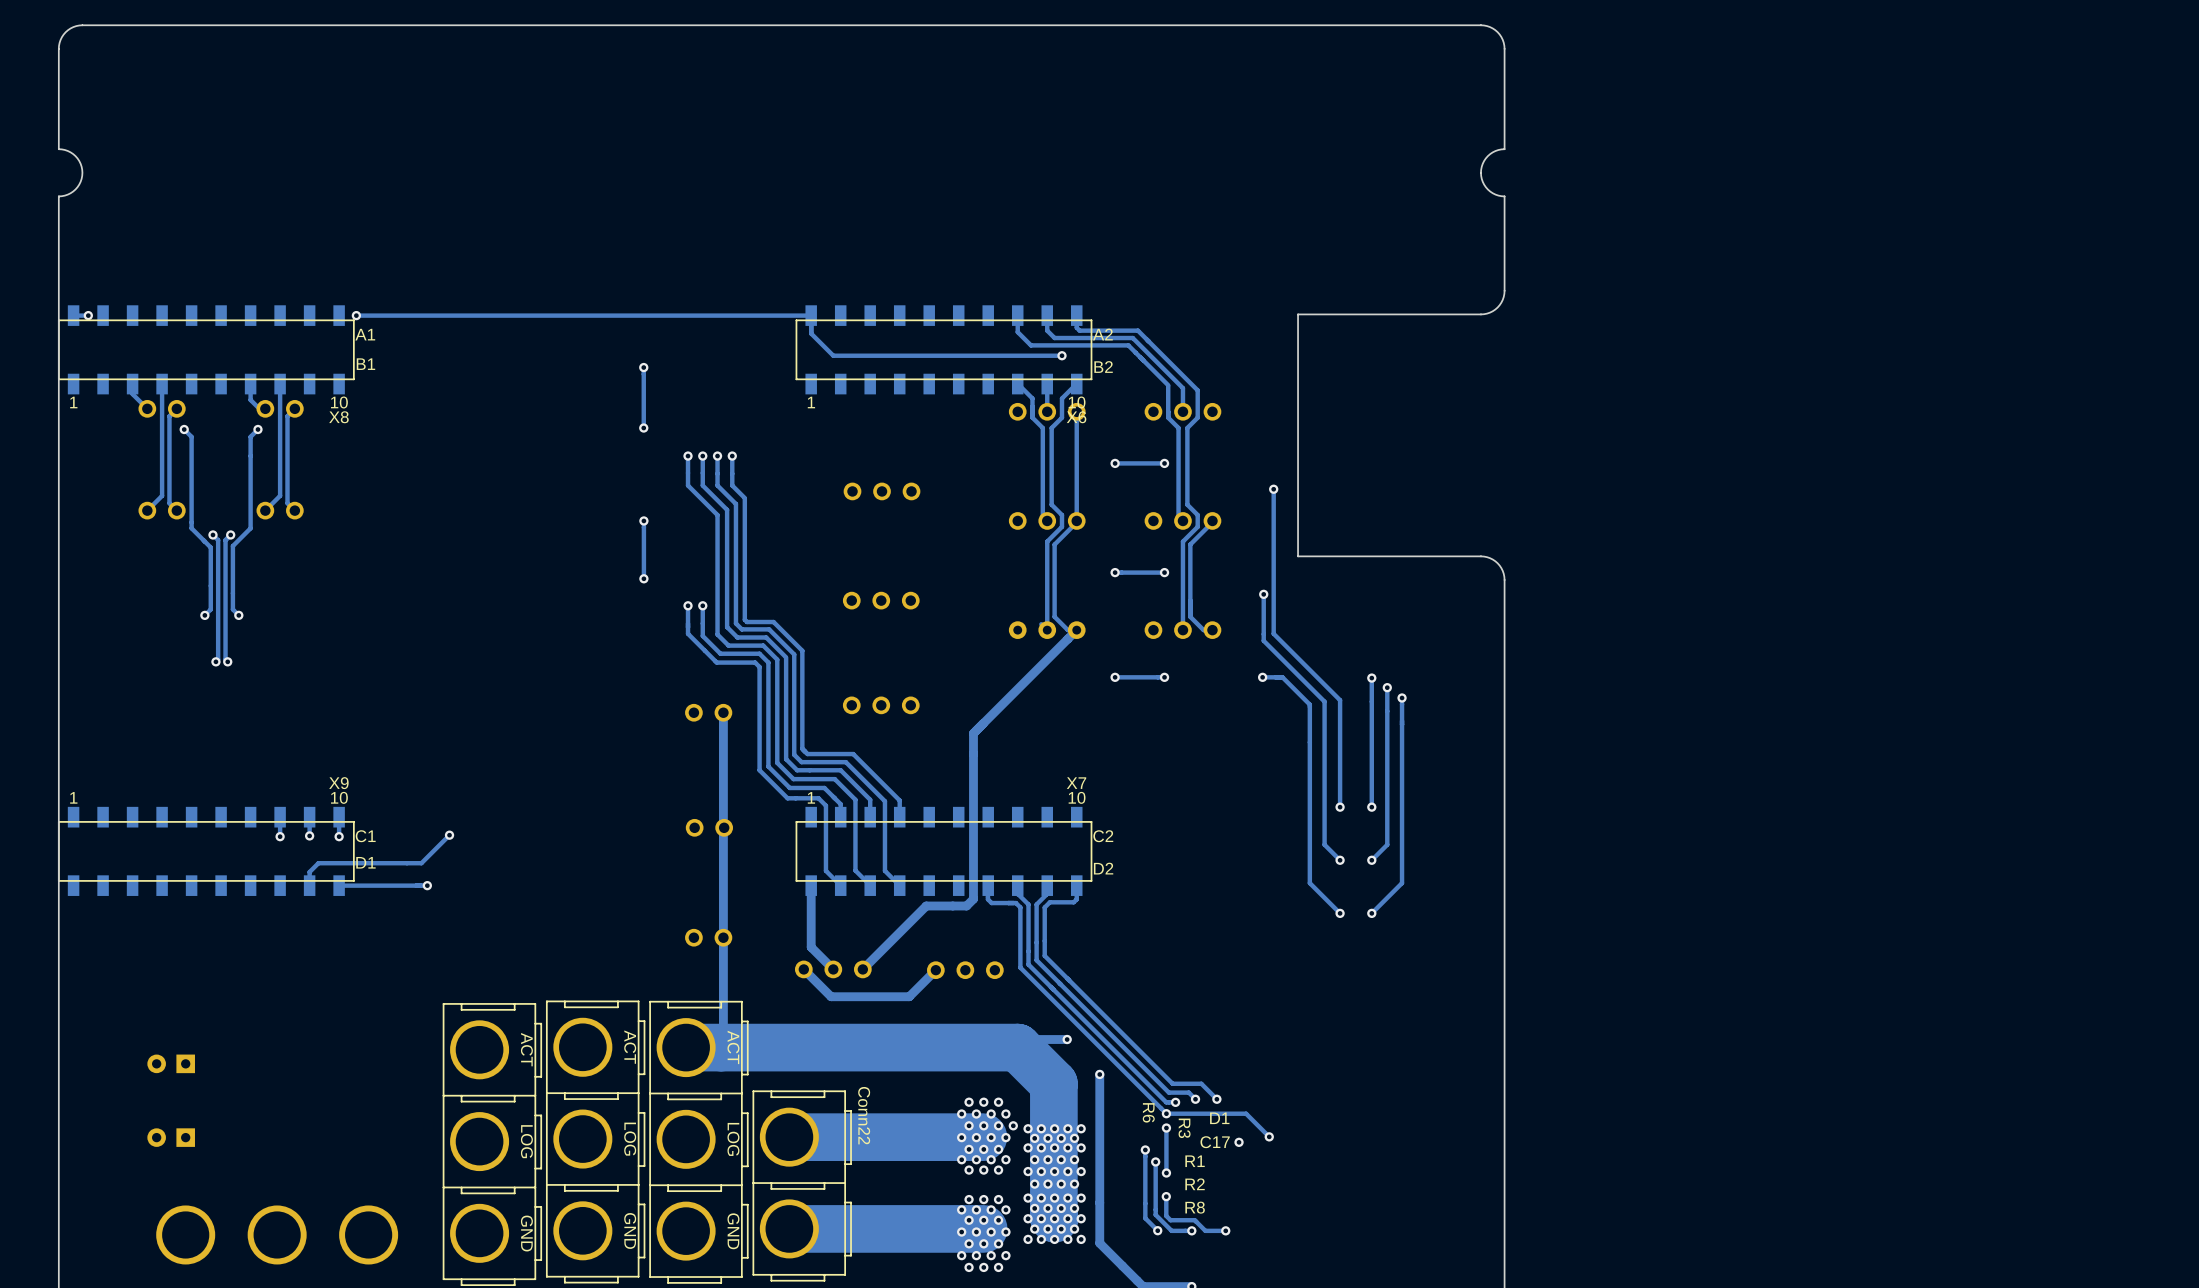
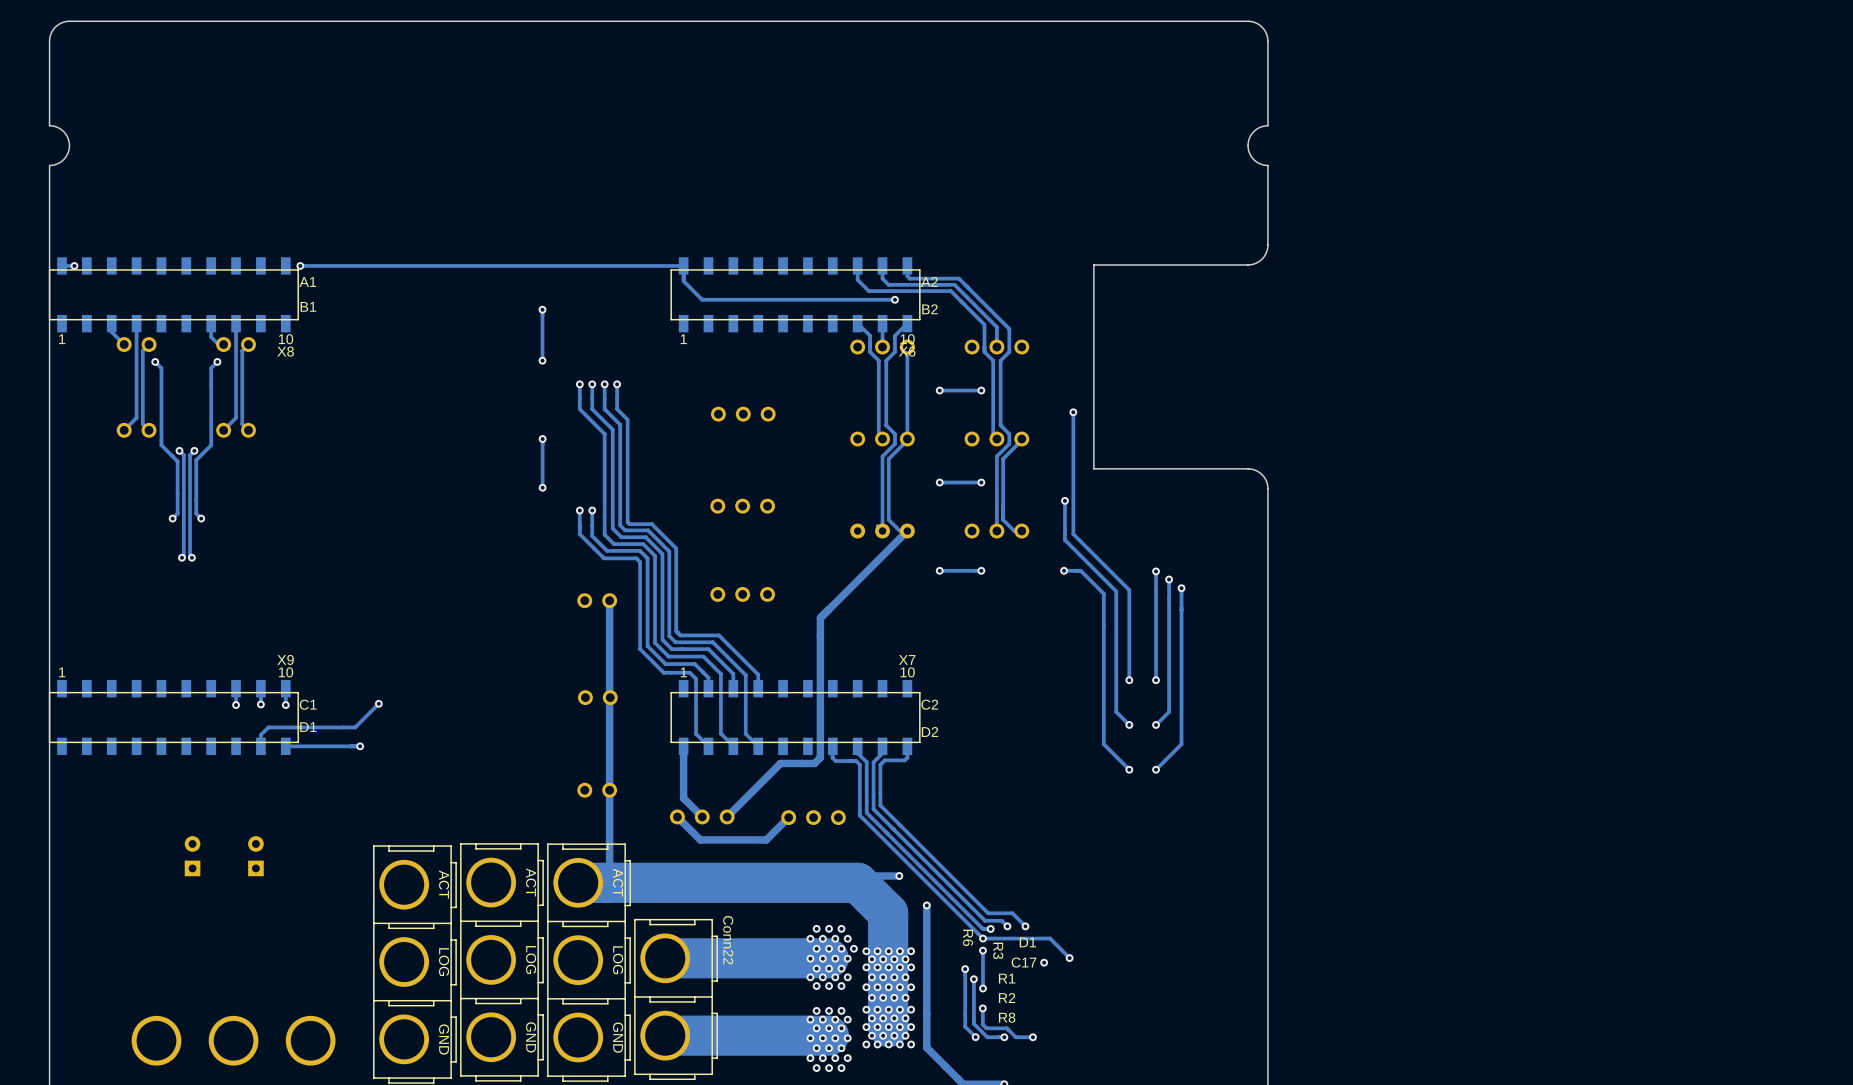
part: none -> (192, 856)
part: none -> (255, 856)
part: (171, 1063) -> none
part: (171, 1137) -> none

